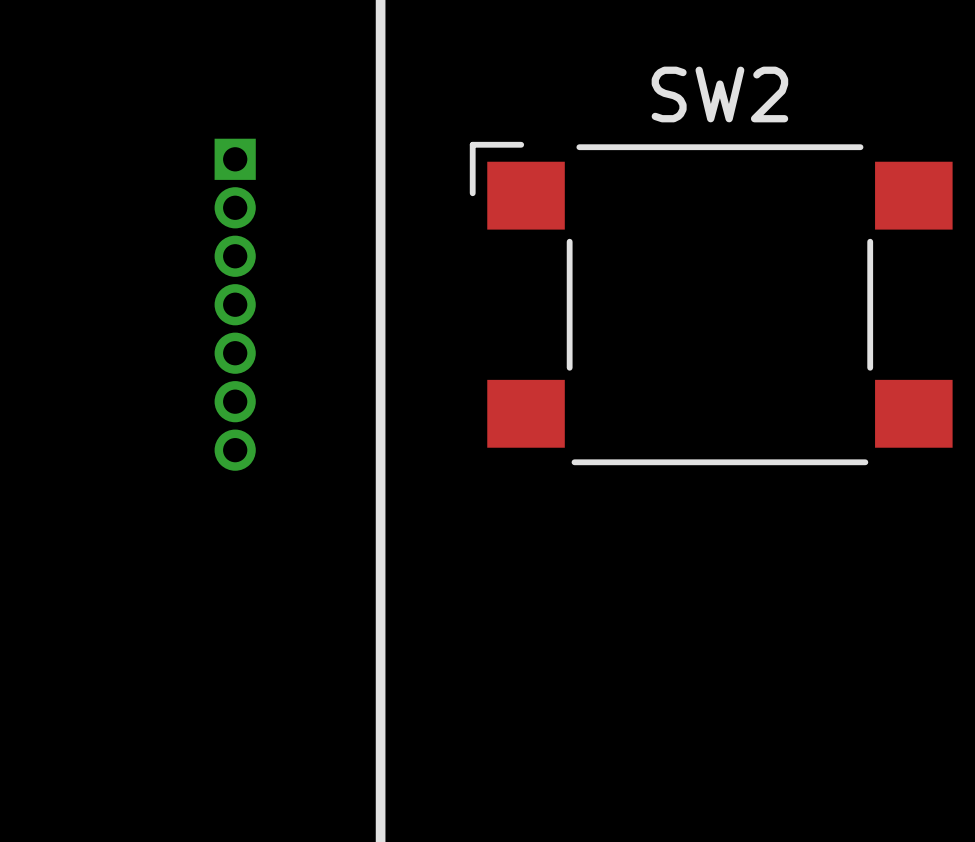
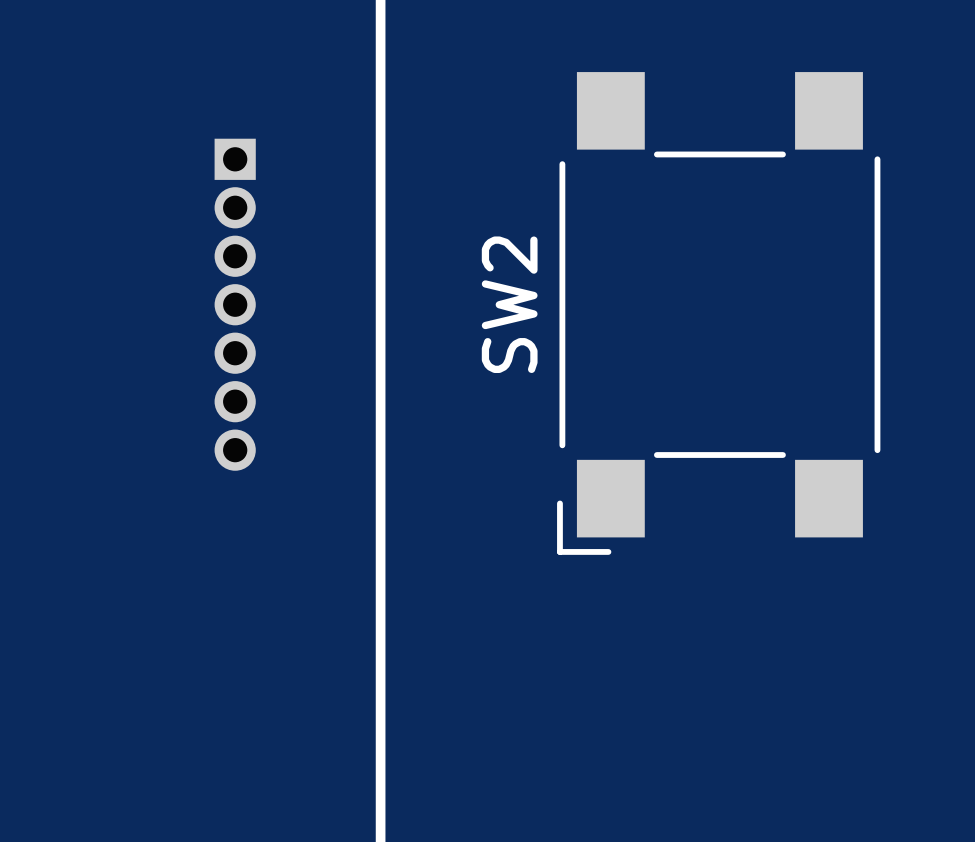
SW2 rotation: 0° (711, 303) -> 90° counterclockwise (718, 313)

